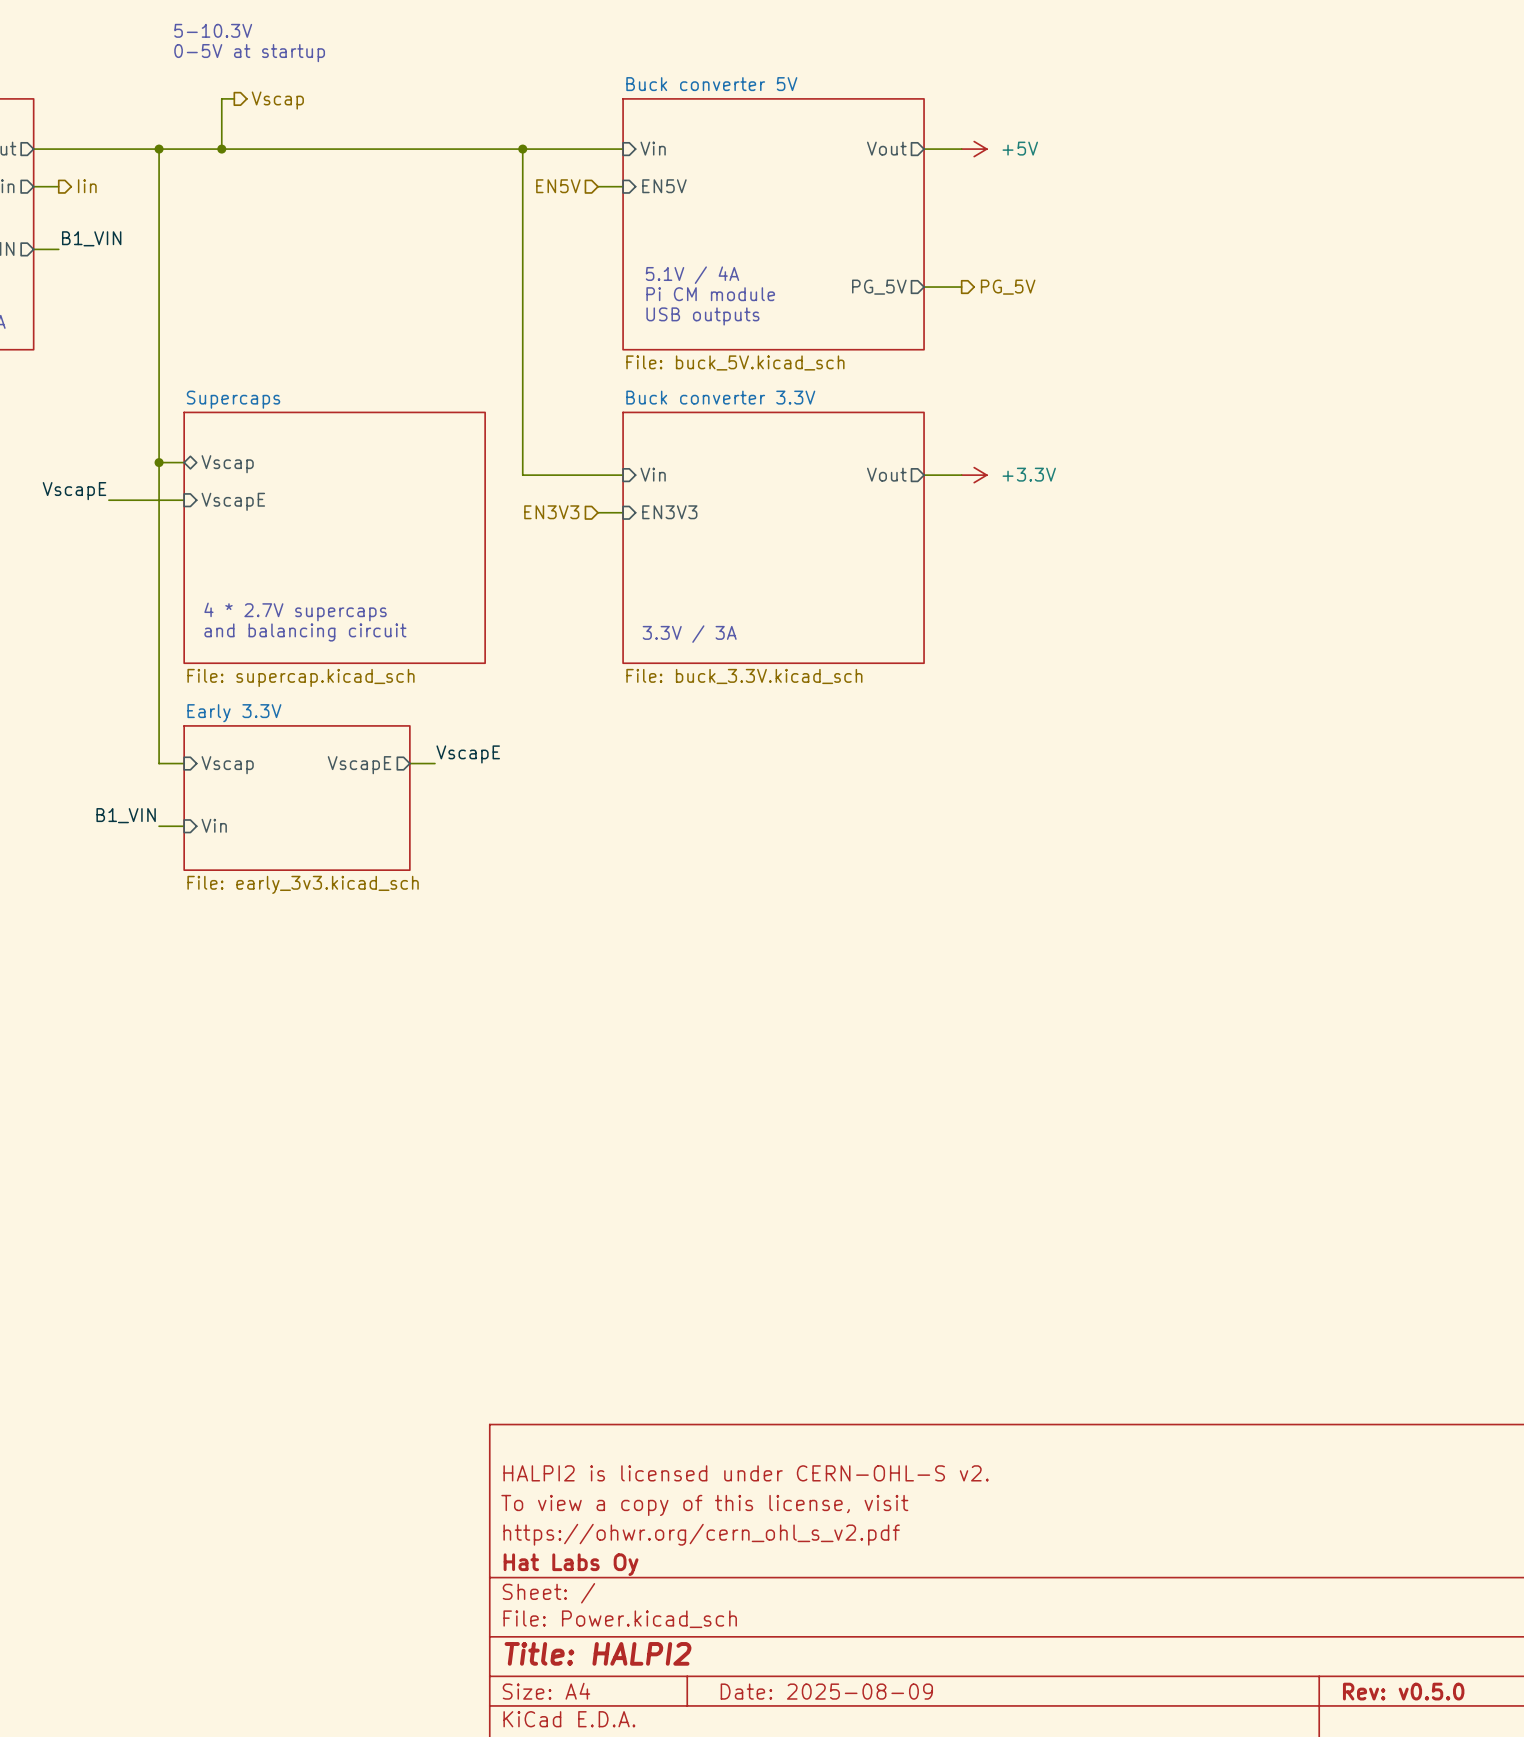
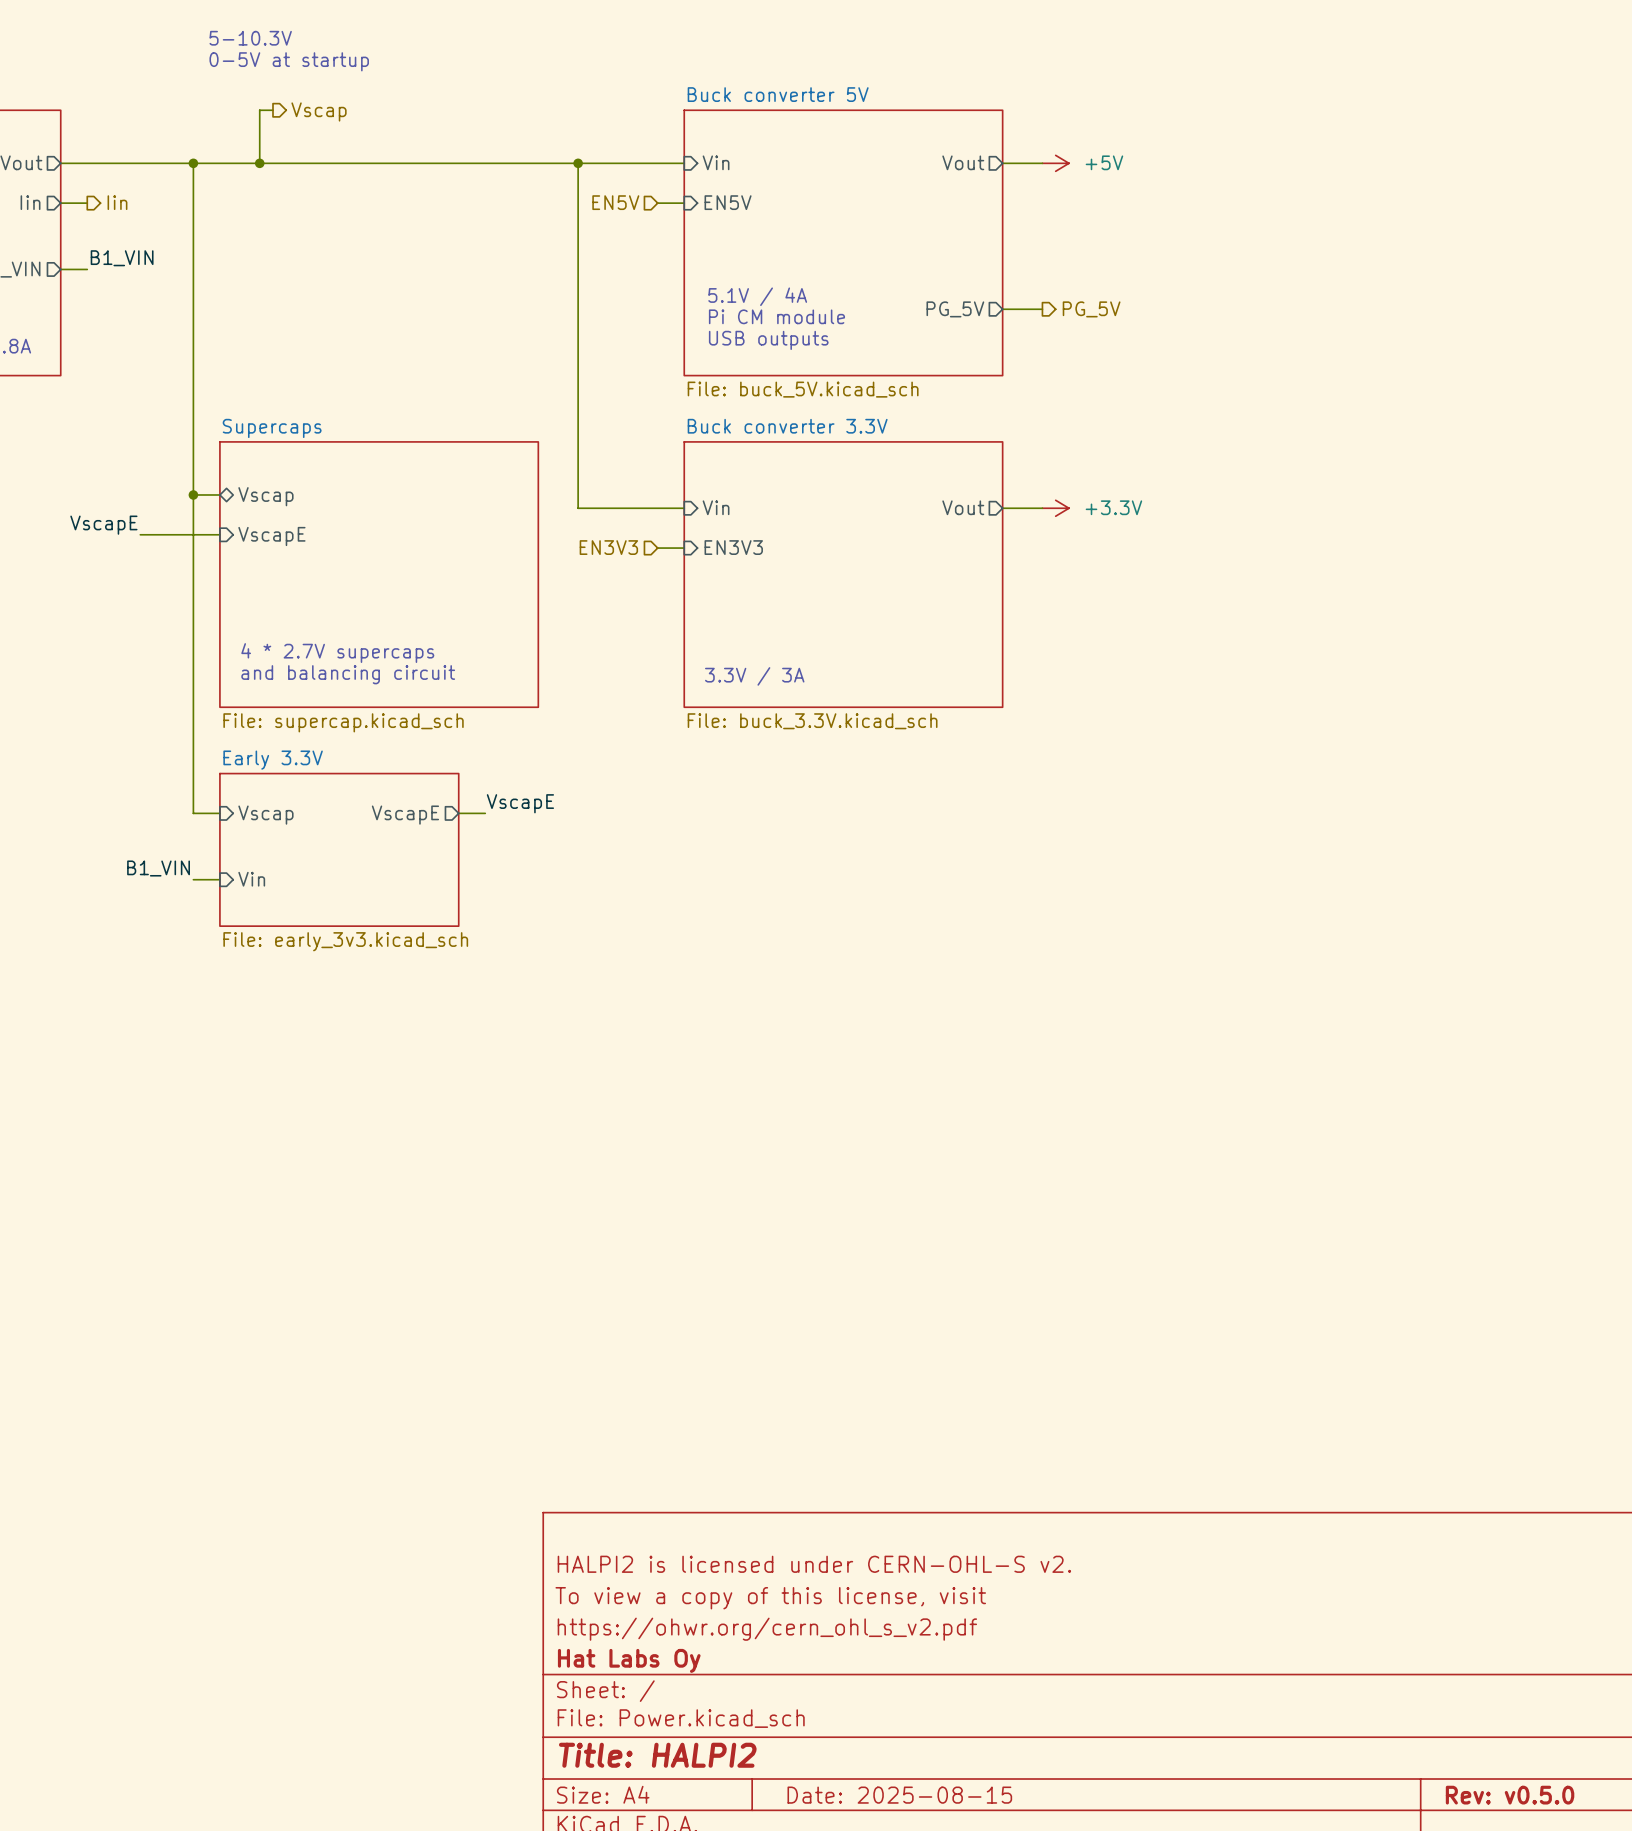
title block: Date: 2025-08-09 (826, 1691) -> Date: 2025-08-15 (899, 1795)

